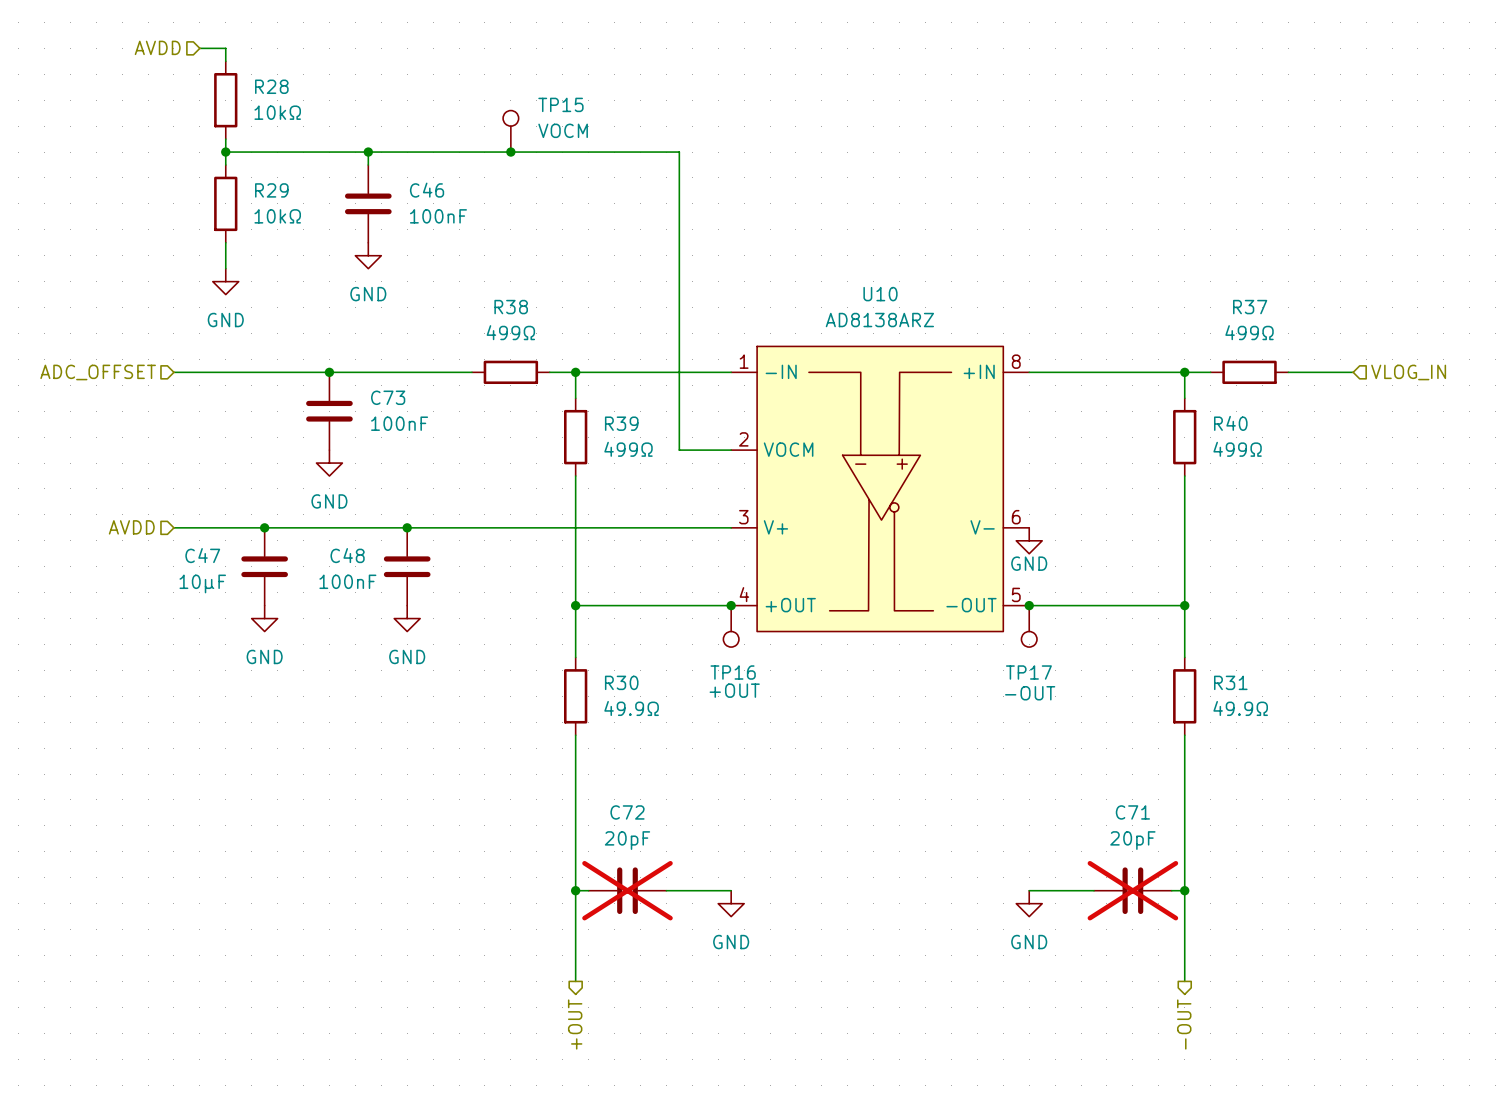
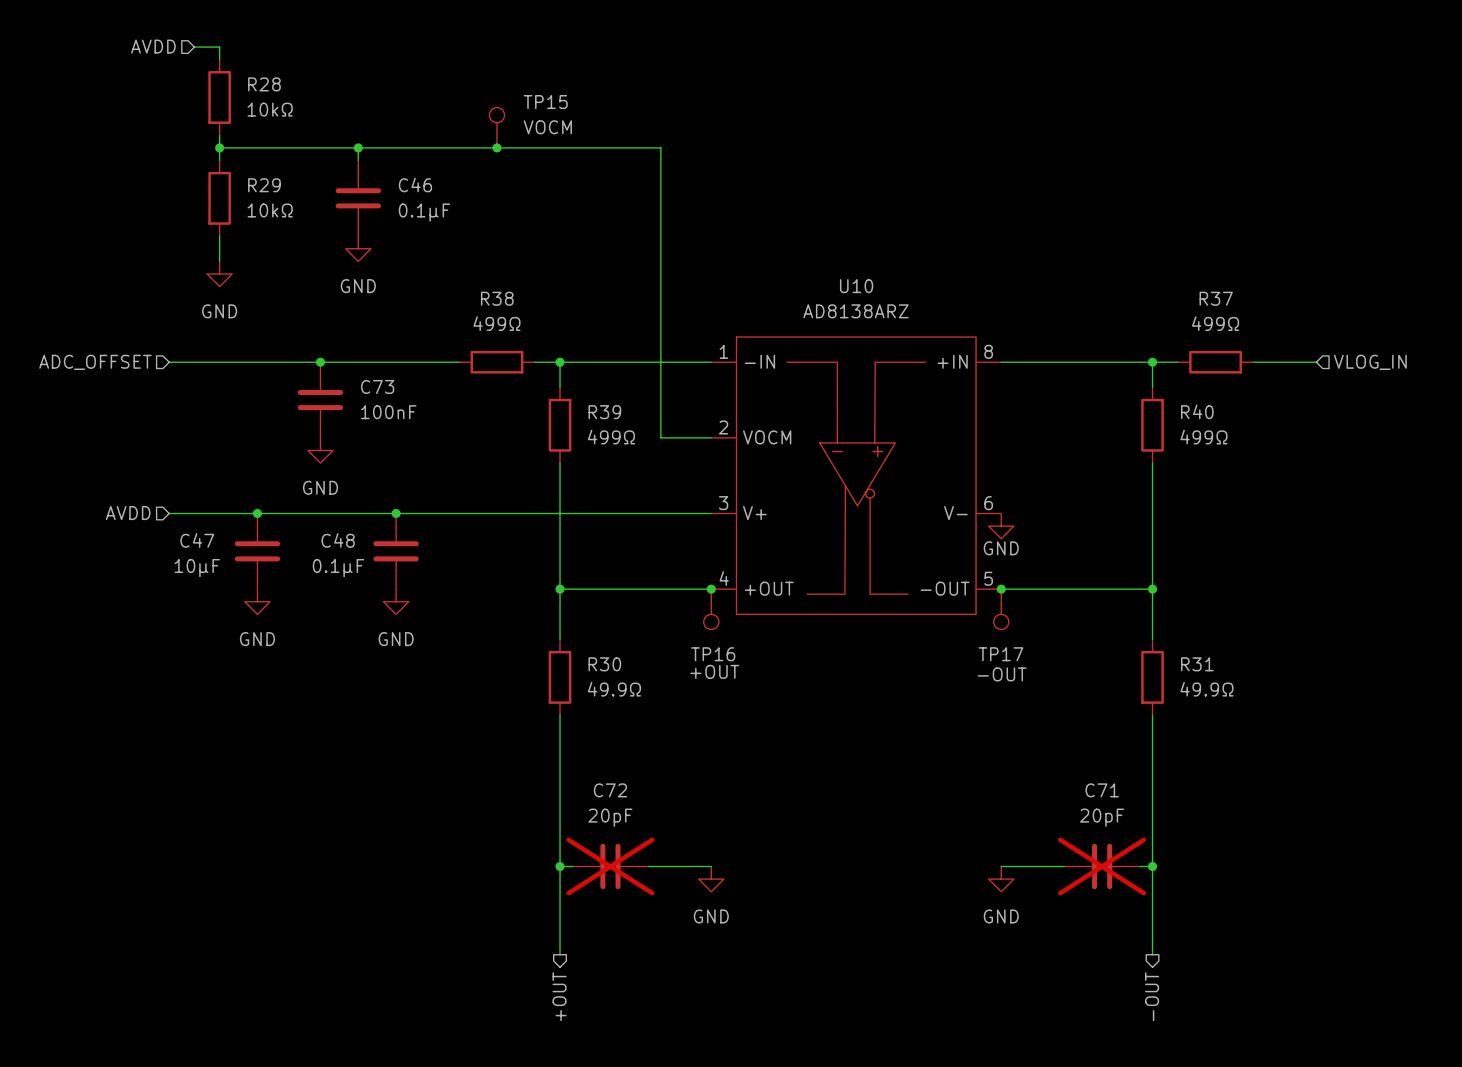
C46 value: 100nF (438, 216) -> 0.1µF (424, 212)
C48 value: 100nF (347, 581) -> 0.1µF (338, 568)

